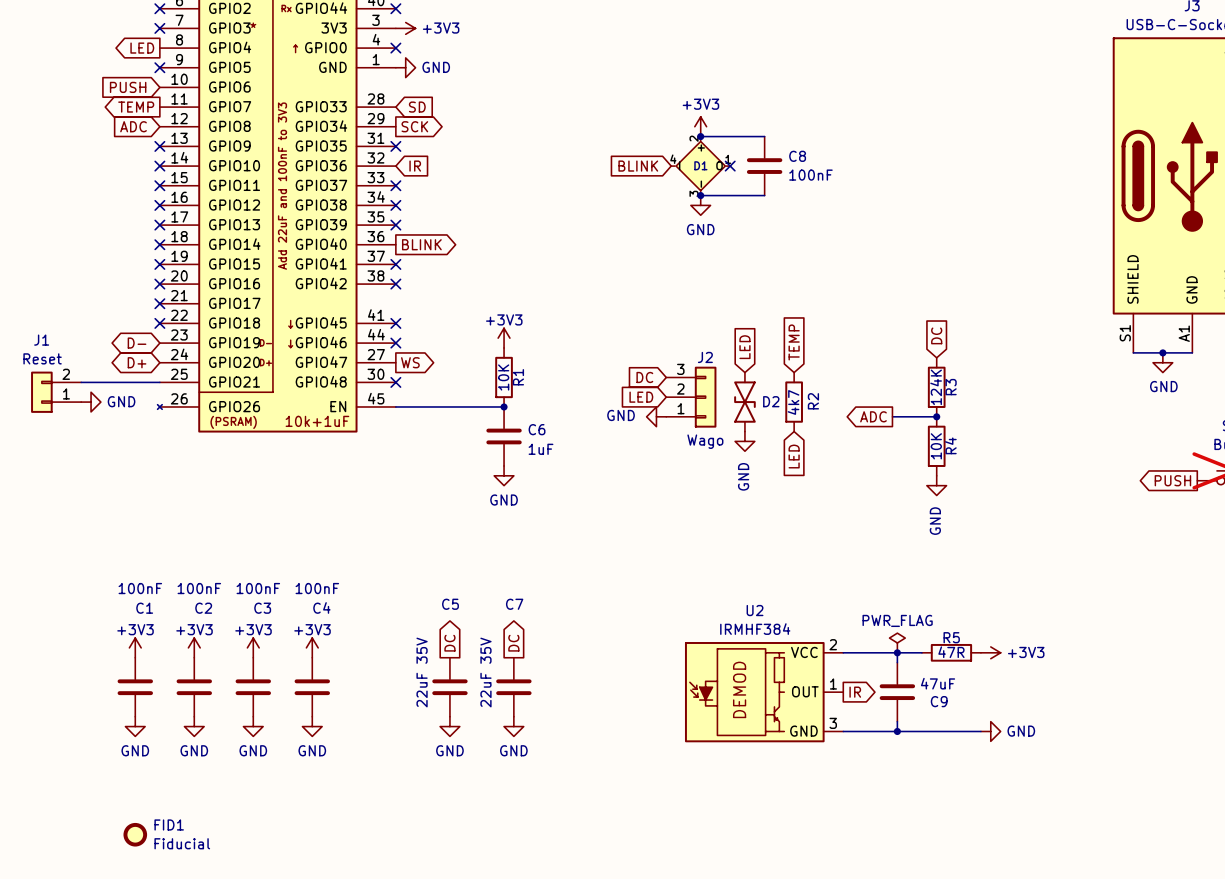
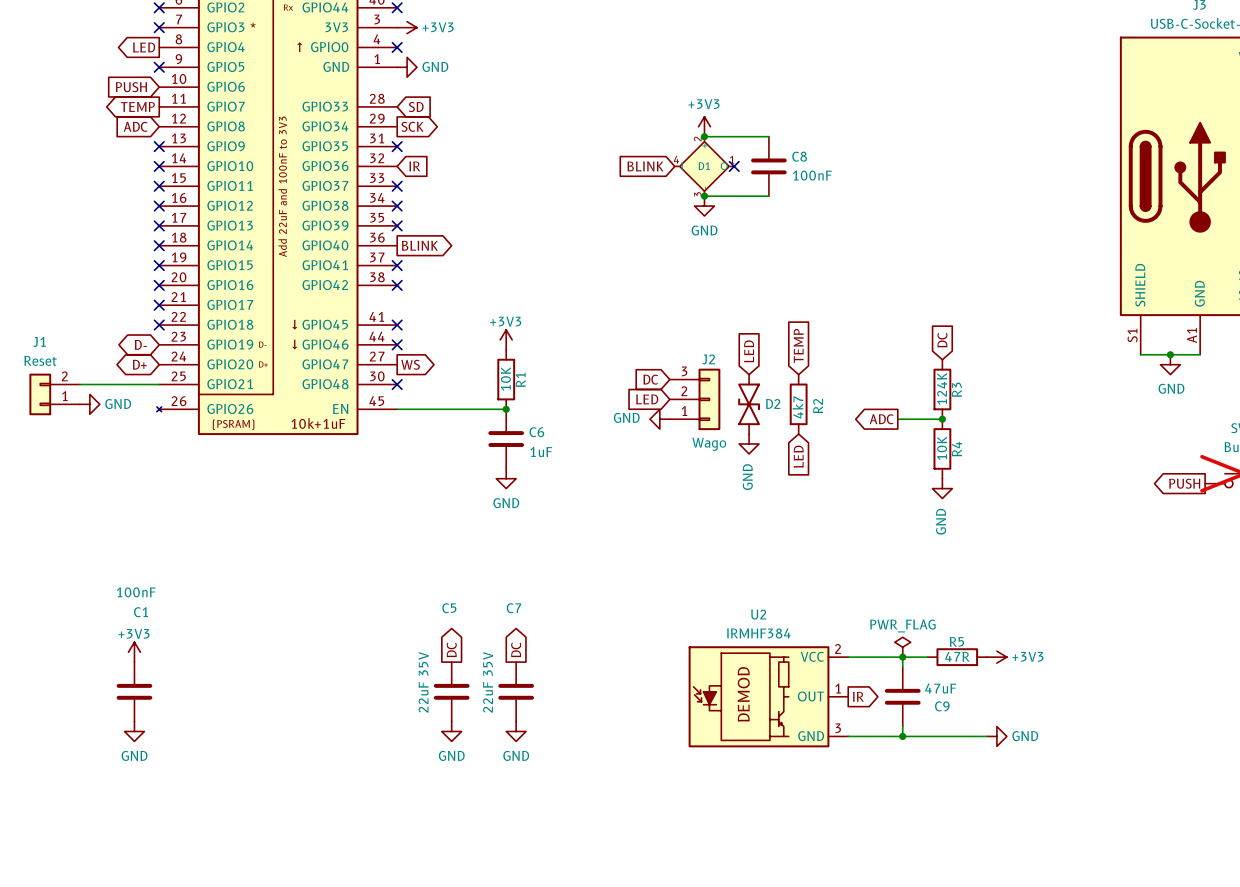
power symbol: +3V3 (194, 647) -> none
power symbol: +3V3 (253, 647) -> none
power symbol: +3V3 (312, 647) -> none
C2: 100nF (194, 687) -> none
C3: 100nF (253, 687) -> none
C4: 100nF (312, 687) -> none
power symbol: GND (194, 726) -> none
power symbol: GND (253, 726) -> none
power symbol: GND (312, 726) -> none
FID1: Fiducial (135, 834) -> none

